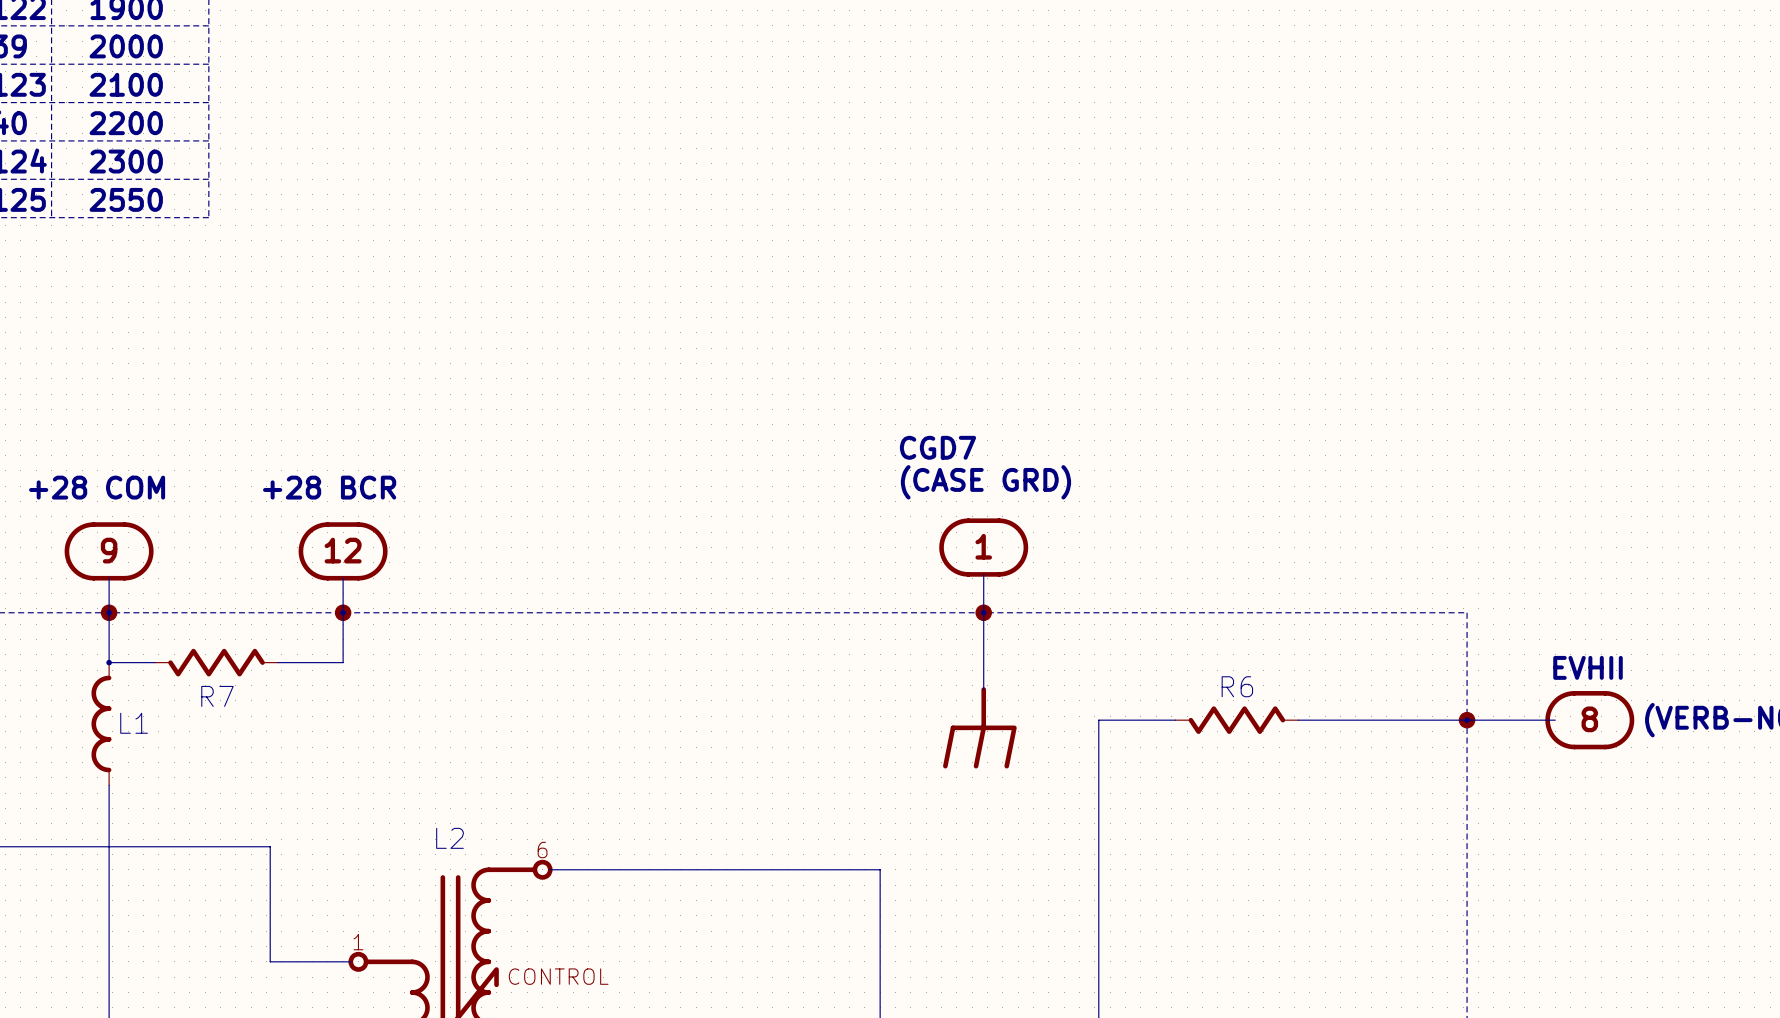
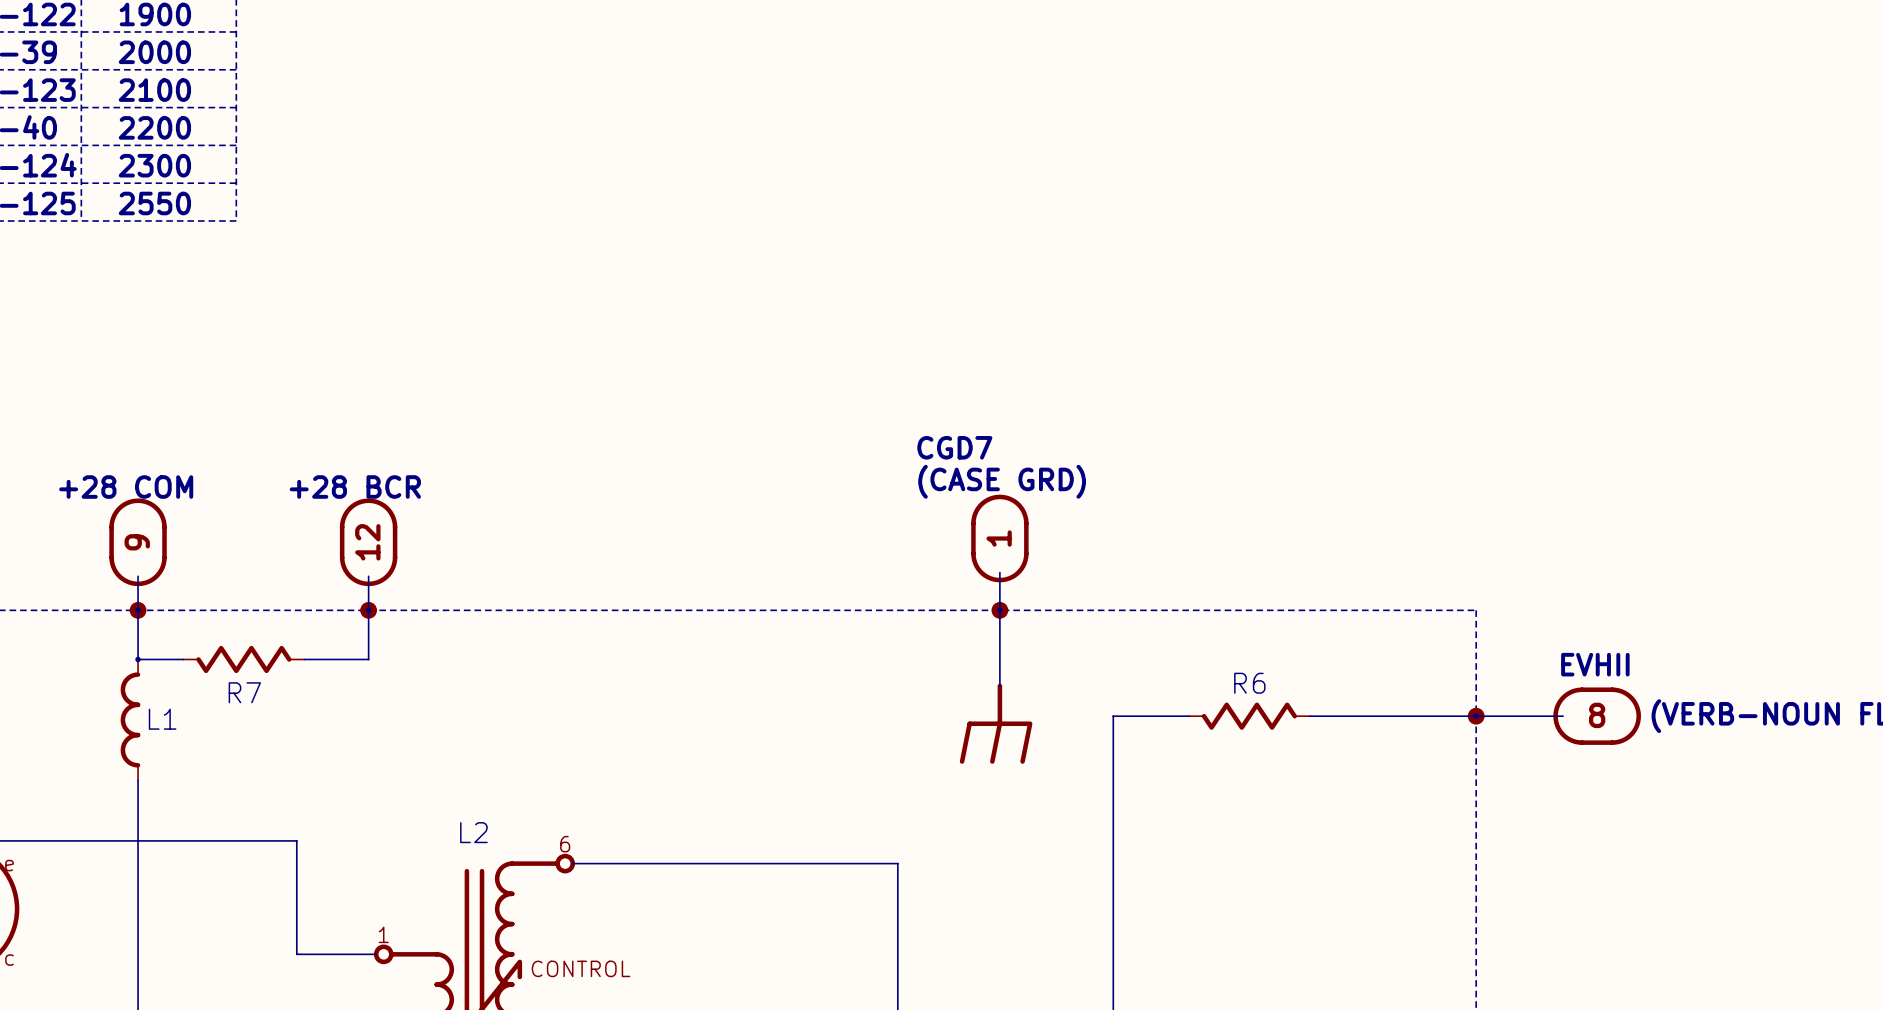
part rotation: 0° (983, 547) -> 90° clockwise (999, 538)
part rotation: 0° (109, 551) -> 90° clockwise (138, 542)
part rotation: 0° (343, 551) -> 90° clockwise (368, 542)

